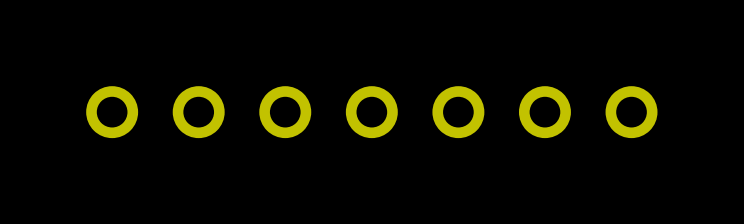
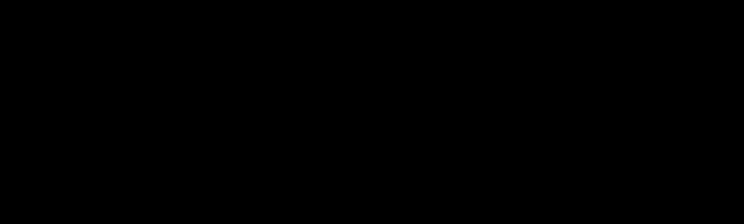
part: (371, 112) -> none

